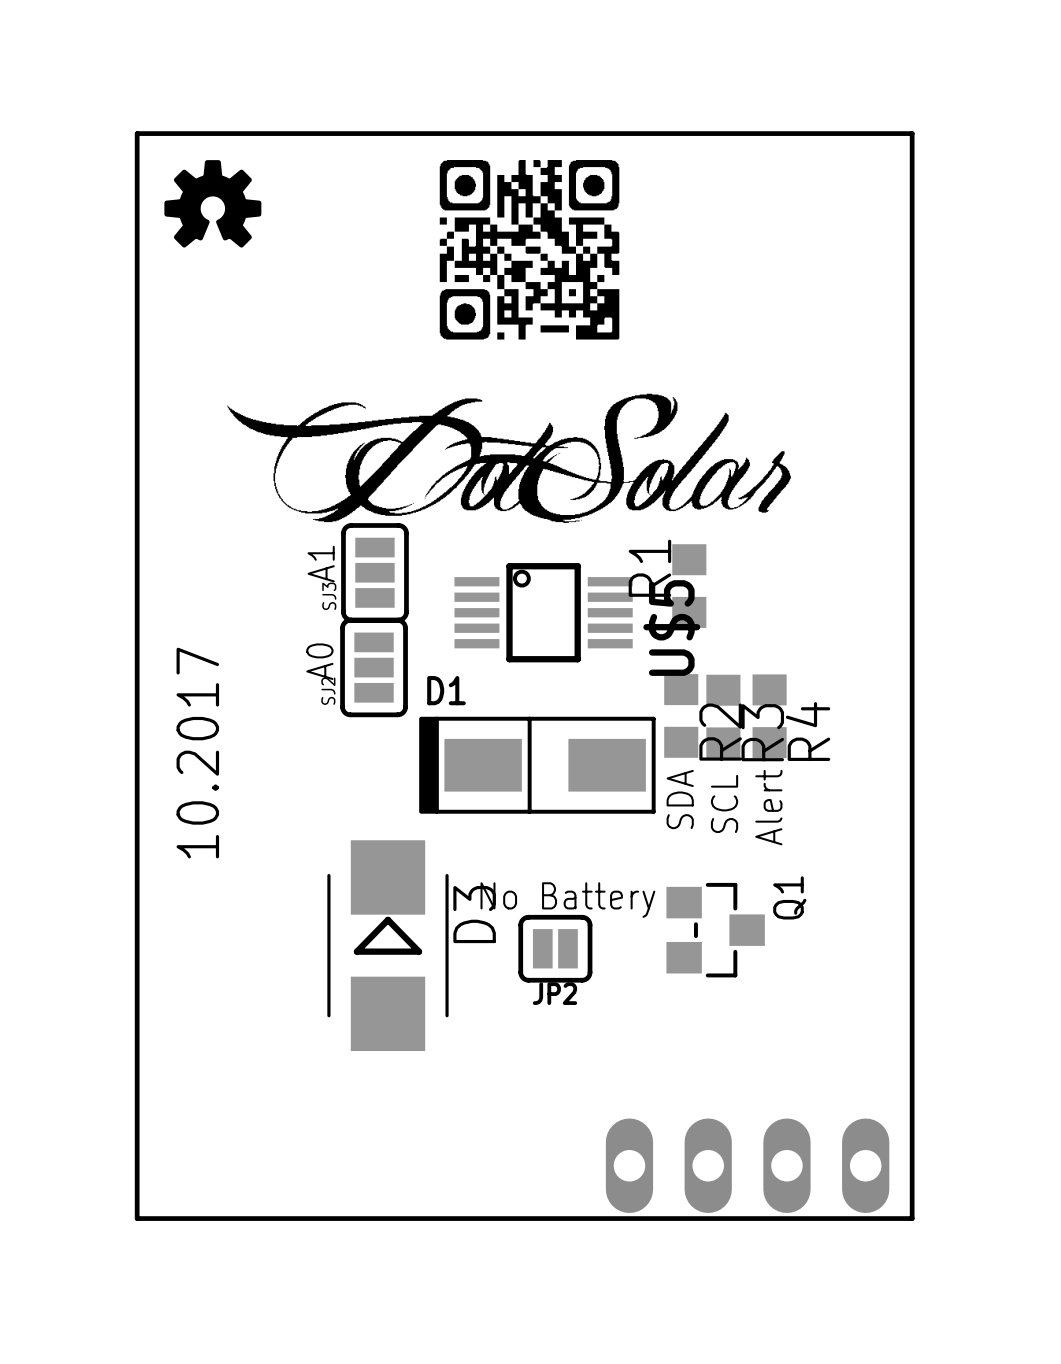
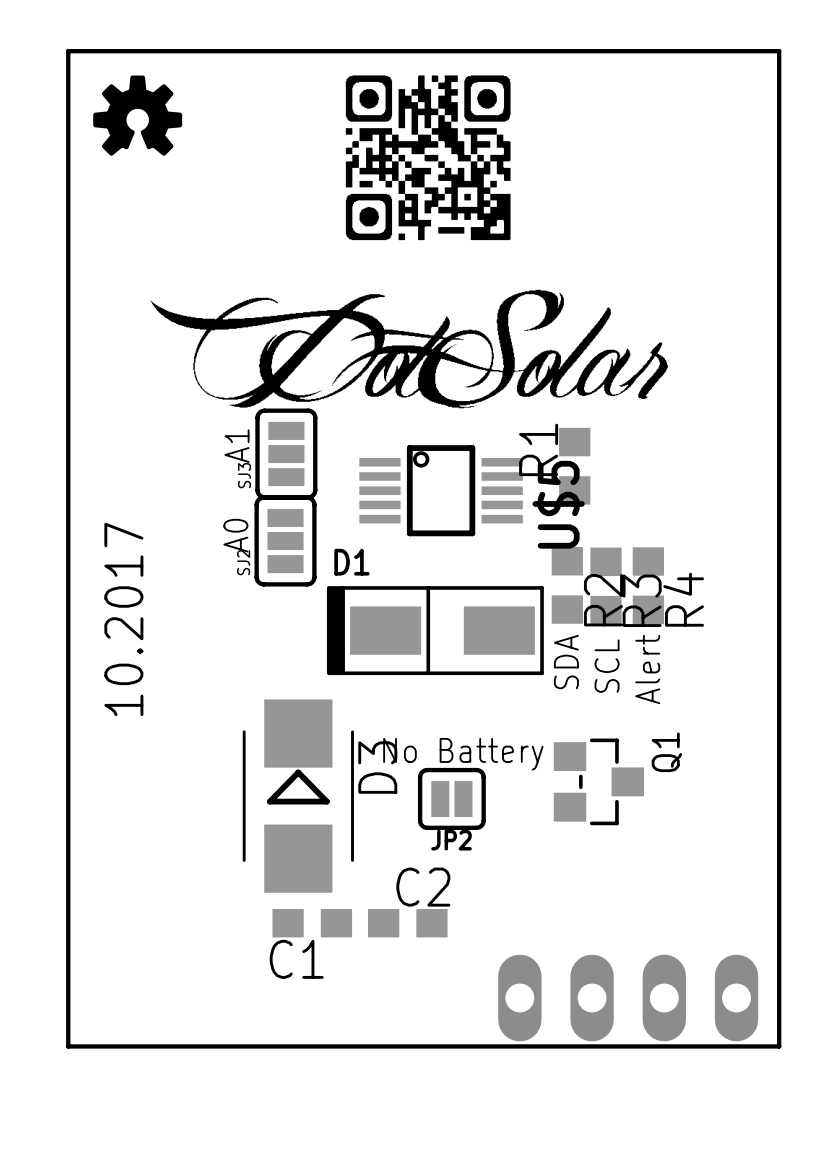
C1: none -> (312, 923)
C2: none -> (407, 923)

